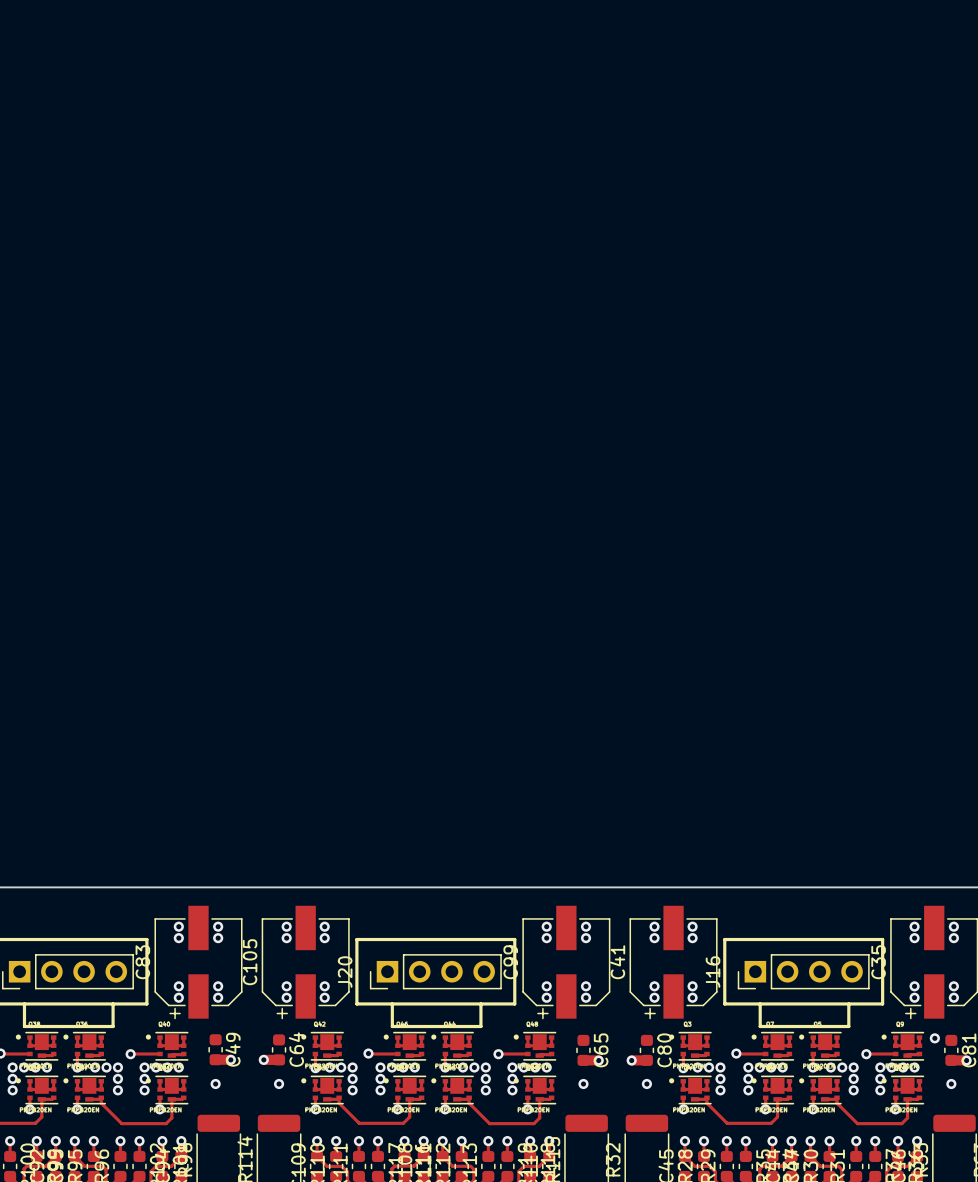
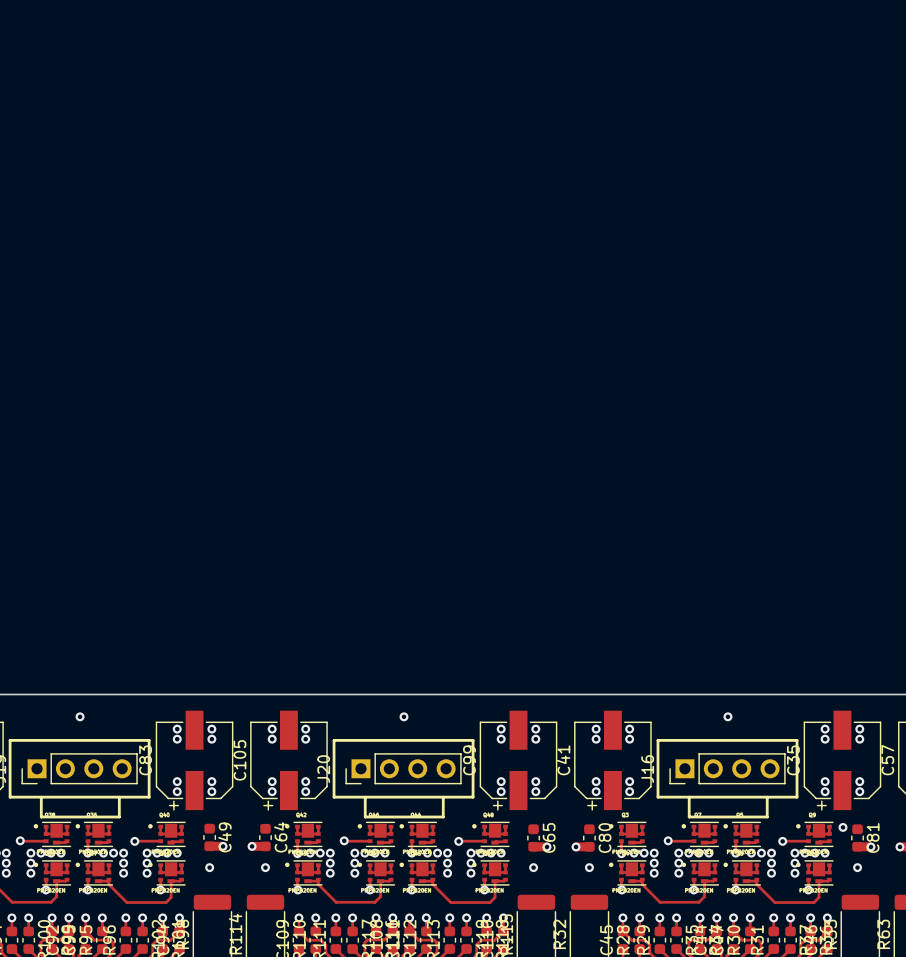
via: none -> (80, 716)
via: none -> (404, 716)
via: none -> (727, 716)

